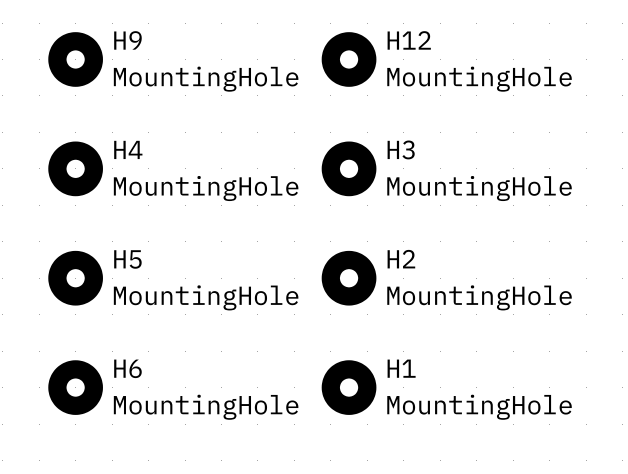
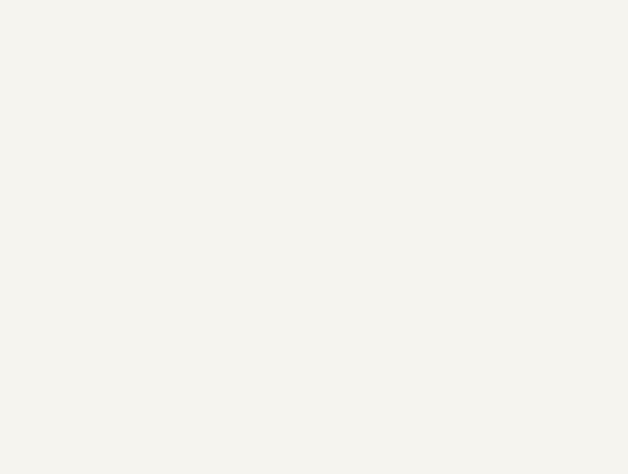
H9: MountingHole (75, 59) -> none
H12: MountingHole (349, 59) -> none
H4: MountingHole (75, 168) -> none
H3: MountingHole (349, 168) -> none
H5: MountingHole (75, 278) -> none
H2: MountingHole (349, 278) -> none
H6: MountingHole (75, 387) -> none
H1: MountingHole (349, 387) -> none

